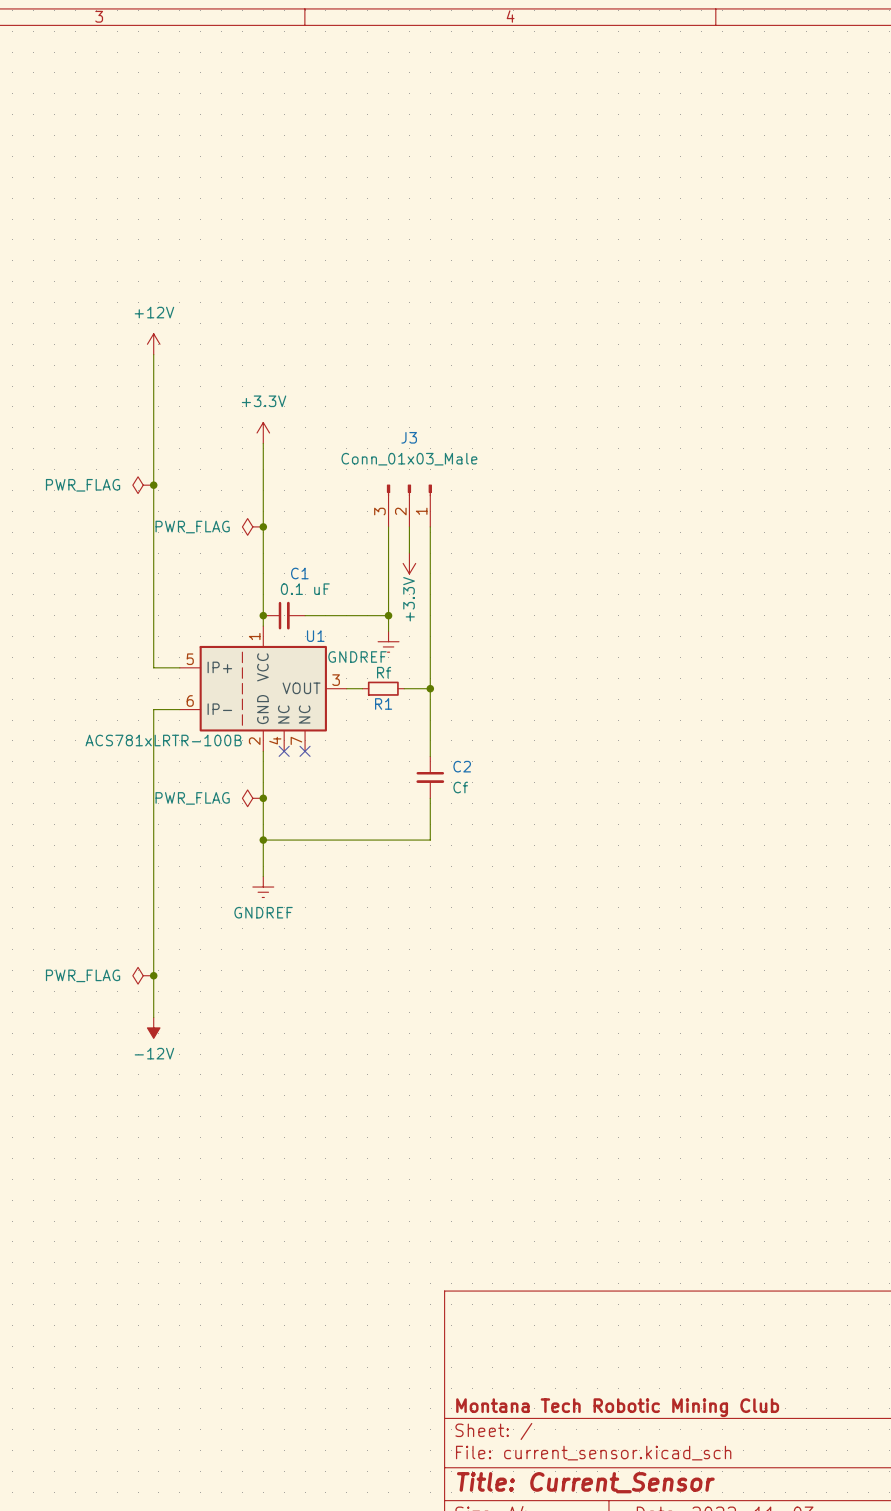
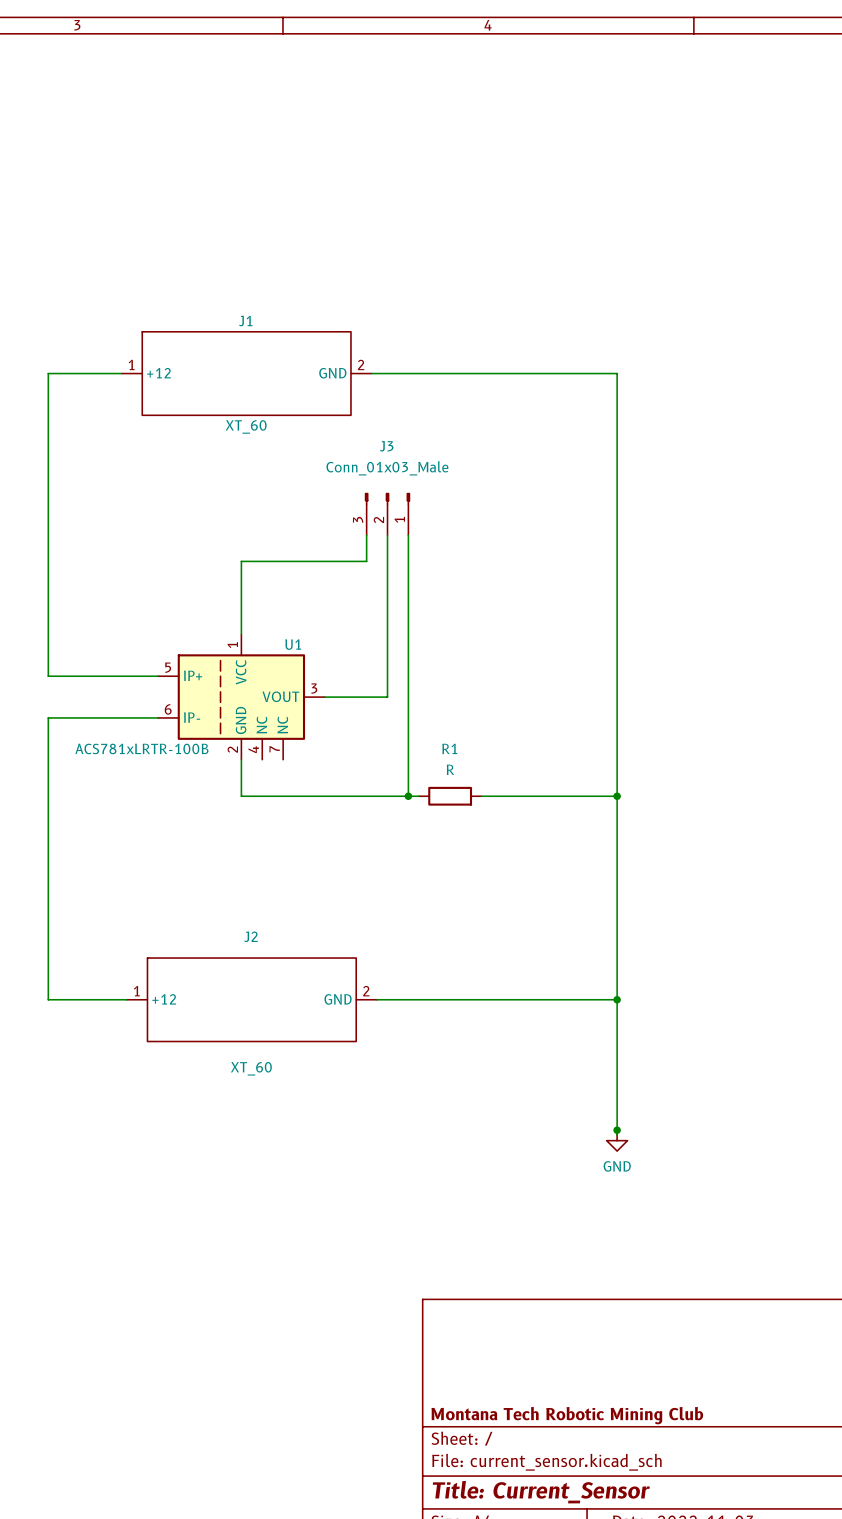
J1: none -> XT_60 (225, 217)
power symbol: +12V (153, 344) -> none
wire: (153, 354) (153, 667) -> (121, 373) (48, 373) (48, 676) (131, 676)
wire: none -> (371, 373) (617, 373) (617, 1135)
power symbol: +3.3V (263, 432) -> none
wire: (263, 443) (263, 553) -> none
power symbol: PWR_FLAG (143, 485) -> none
junction: (153, 485) -> none
power symbol: PWR_FLAG (252, 526) -> none
junction: (263, 526) -> none
wire: (388, 553) (388, 631) -> (366, 561) (241, 561)
power symbol: +3.3V (409, 563) -> none
junction: (263, 615) -> none
C1: 0.1 uF (284, 615) -> none
wire: (305, 615) (388, 615) -> none
junction: (388, 615) -> none
power symbol: GNDREF (388, 641) -> none
R1 value: Rf (384, 672) -> R (450, 769)
R1 symbol: [362, 681, 405, 696] -> [418, 786, 482, 806]
wire: none -> (340, 697) (382, 697)
wire: (409, 688) (430, 688) -> (387, 697) (387, 561)
junction: (430, 688) -> none
R1 name position: R1 (383, 703) -> R1 (449, 748)
wire: (153, 709) (153, 1017) -> (131, 717) (48, 717) (48, 999) (126, 999)
no-connect mark: (284, 751) -> none
no-connect mark: (305, 751) -> none
C2: Cf (430, 777) -> none
wire: (263, 787) (263, 876) -> (241, 796) (418, 796)
junction: none -> (408, 796)
wire: none -> (481, 796) (617, 796)
junction: none -> (617, 796)
power symbol: PWR_FLAG (252, 798) -> none
junction: (263, 798) -> none
wire: (430, 798) (430, 840) (263, 840) -> none
J2: none -> XT_60 (230, 843)
junction: (263, 840) -> none
power symbol: GNDREF (263, 887) -> none
power symbol: PWR_FLAG (143, 975) -> none
junction: (153, 975) -> none
wire: none -> (377, 999) (617, 999)
junction: none -> (617, 999)
power symbol: -12V (153, 1027) -> none
junction: none -> (617, 1130)
power symbol: none -> GND (617, 1140)

